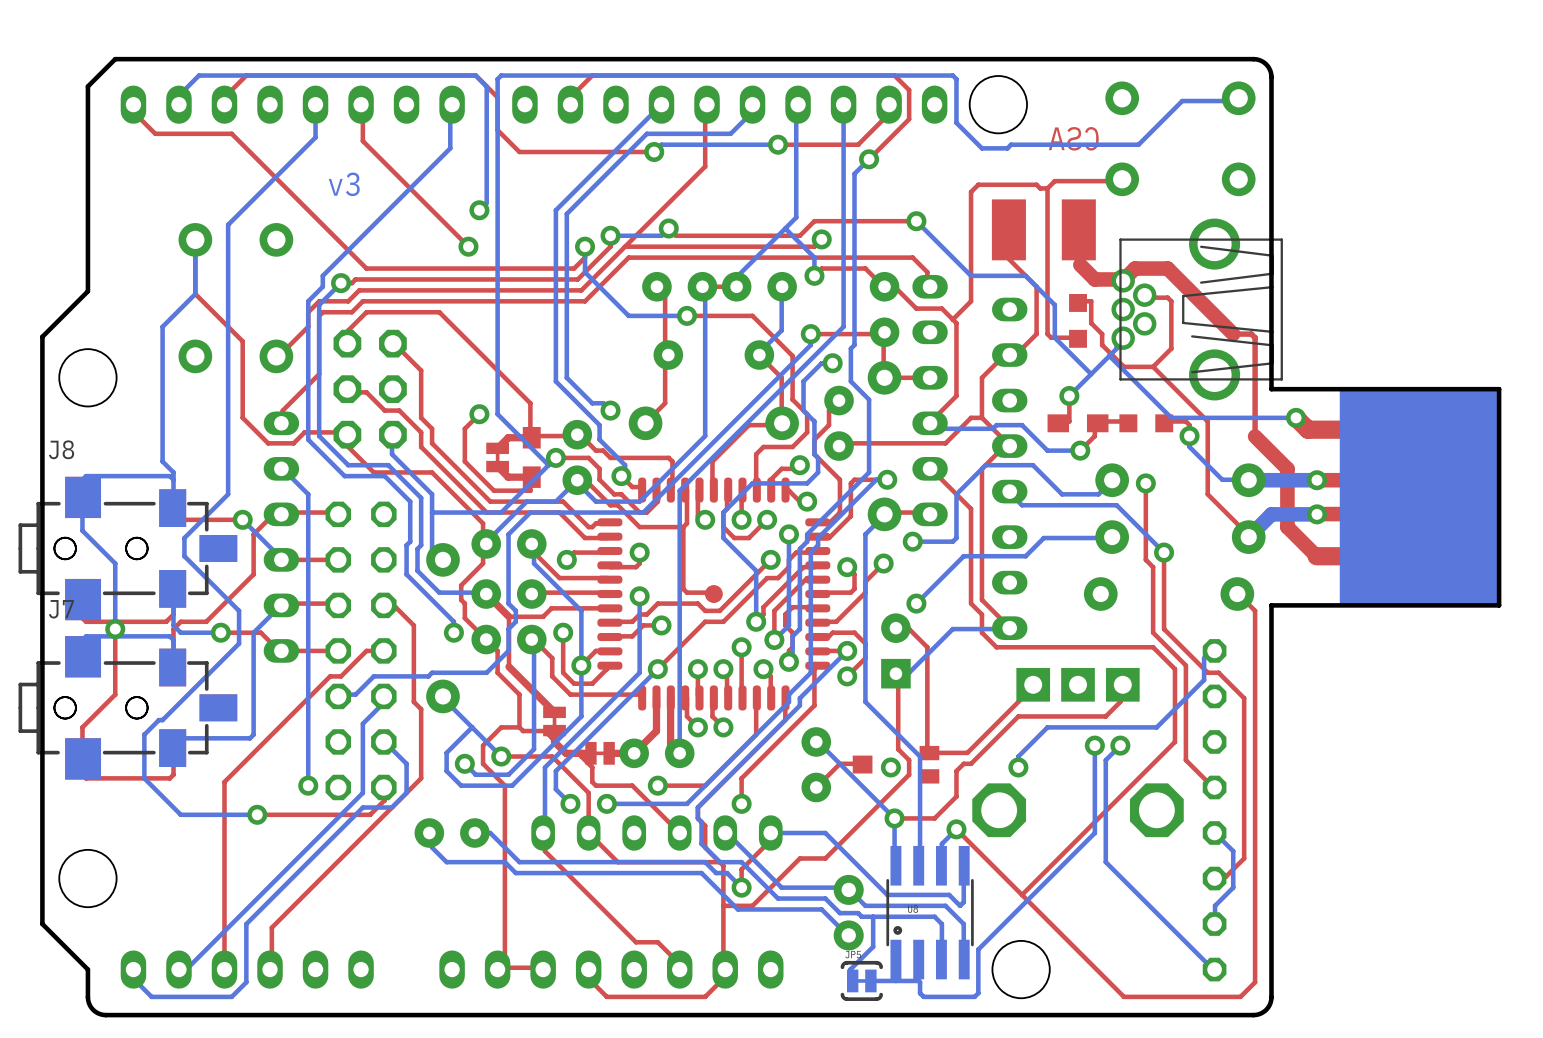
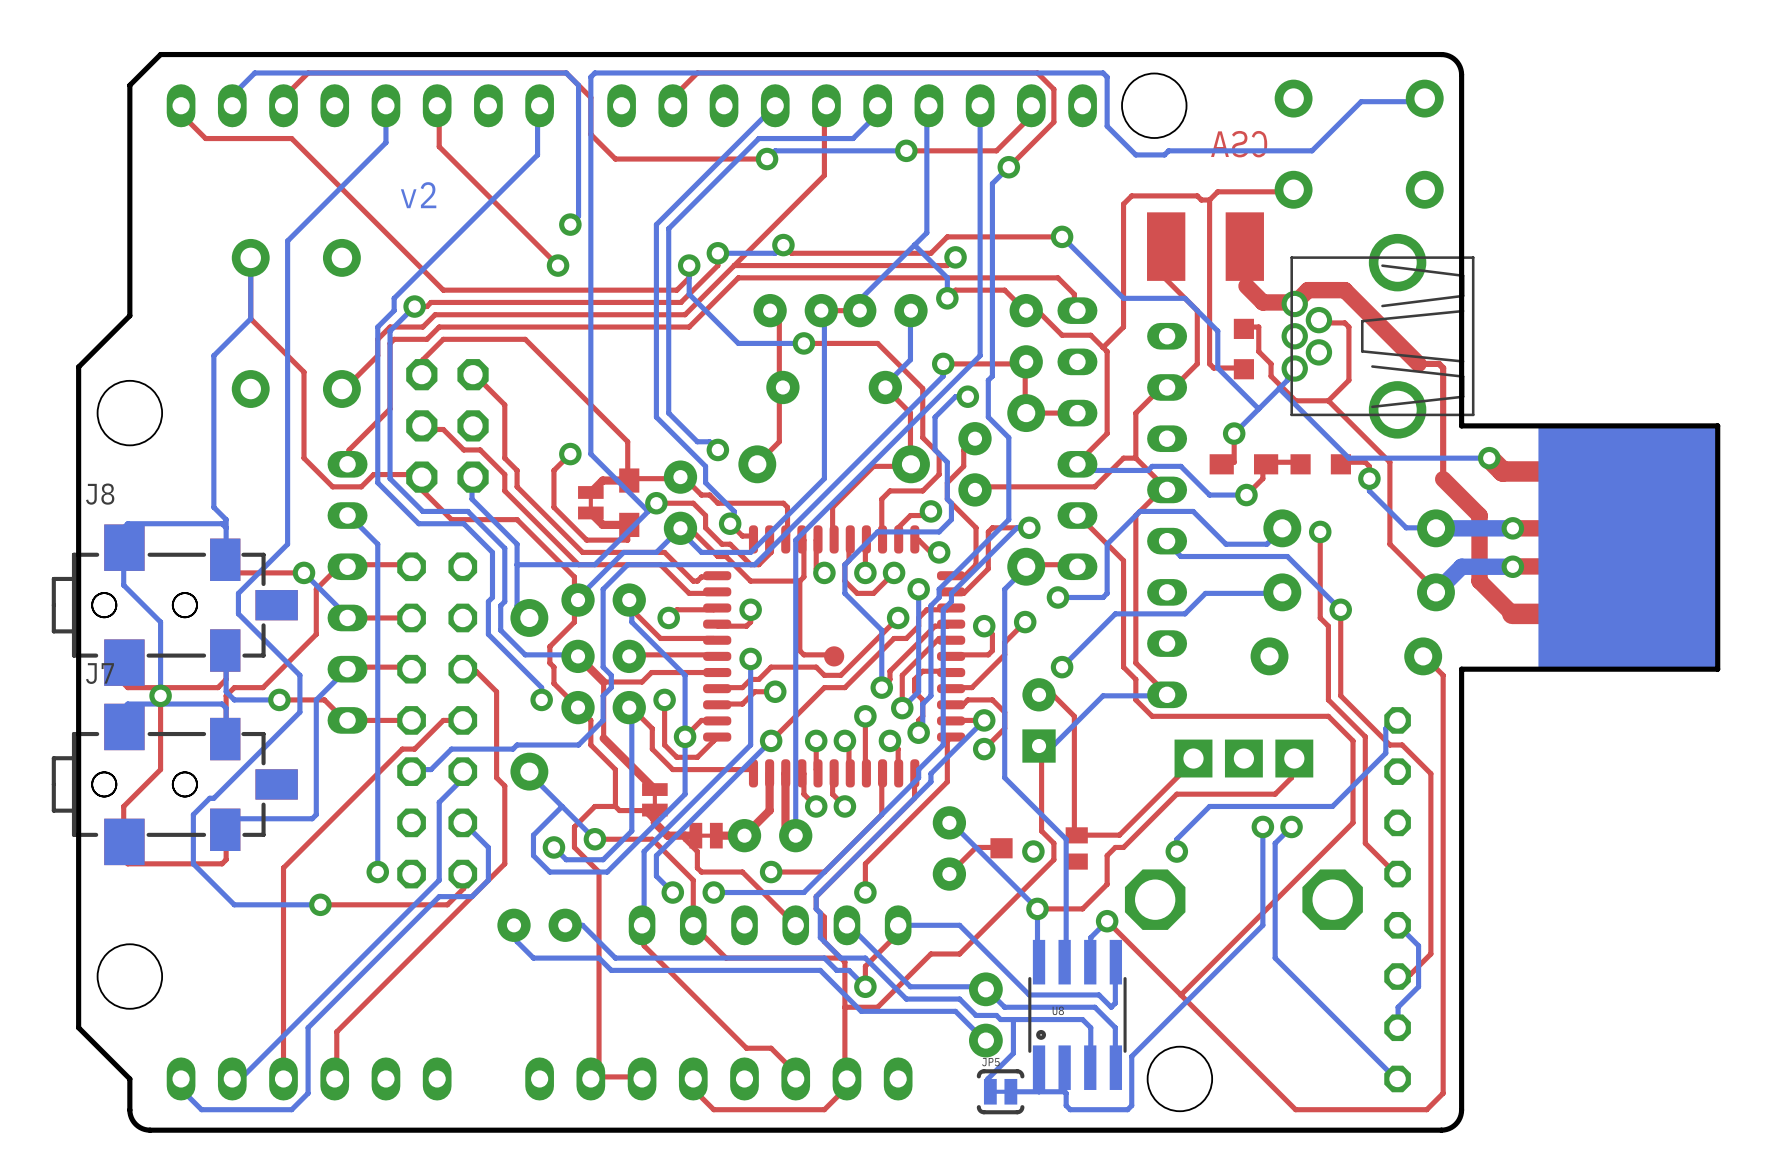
text: v3 (344, 184) -> v2 (418, 195)

